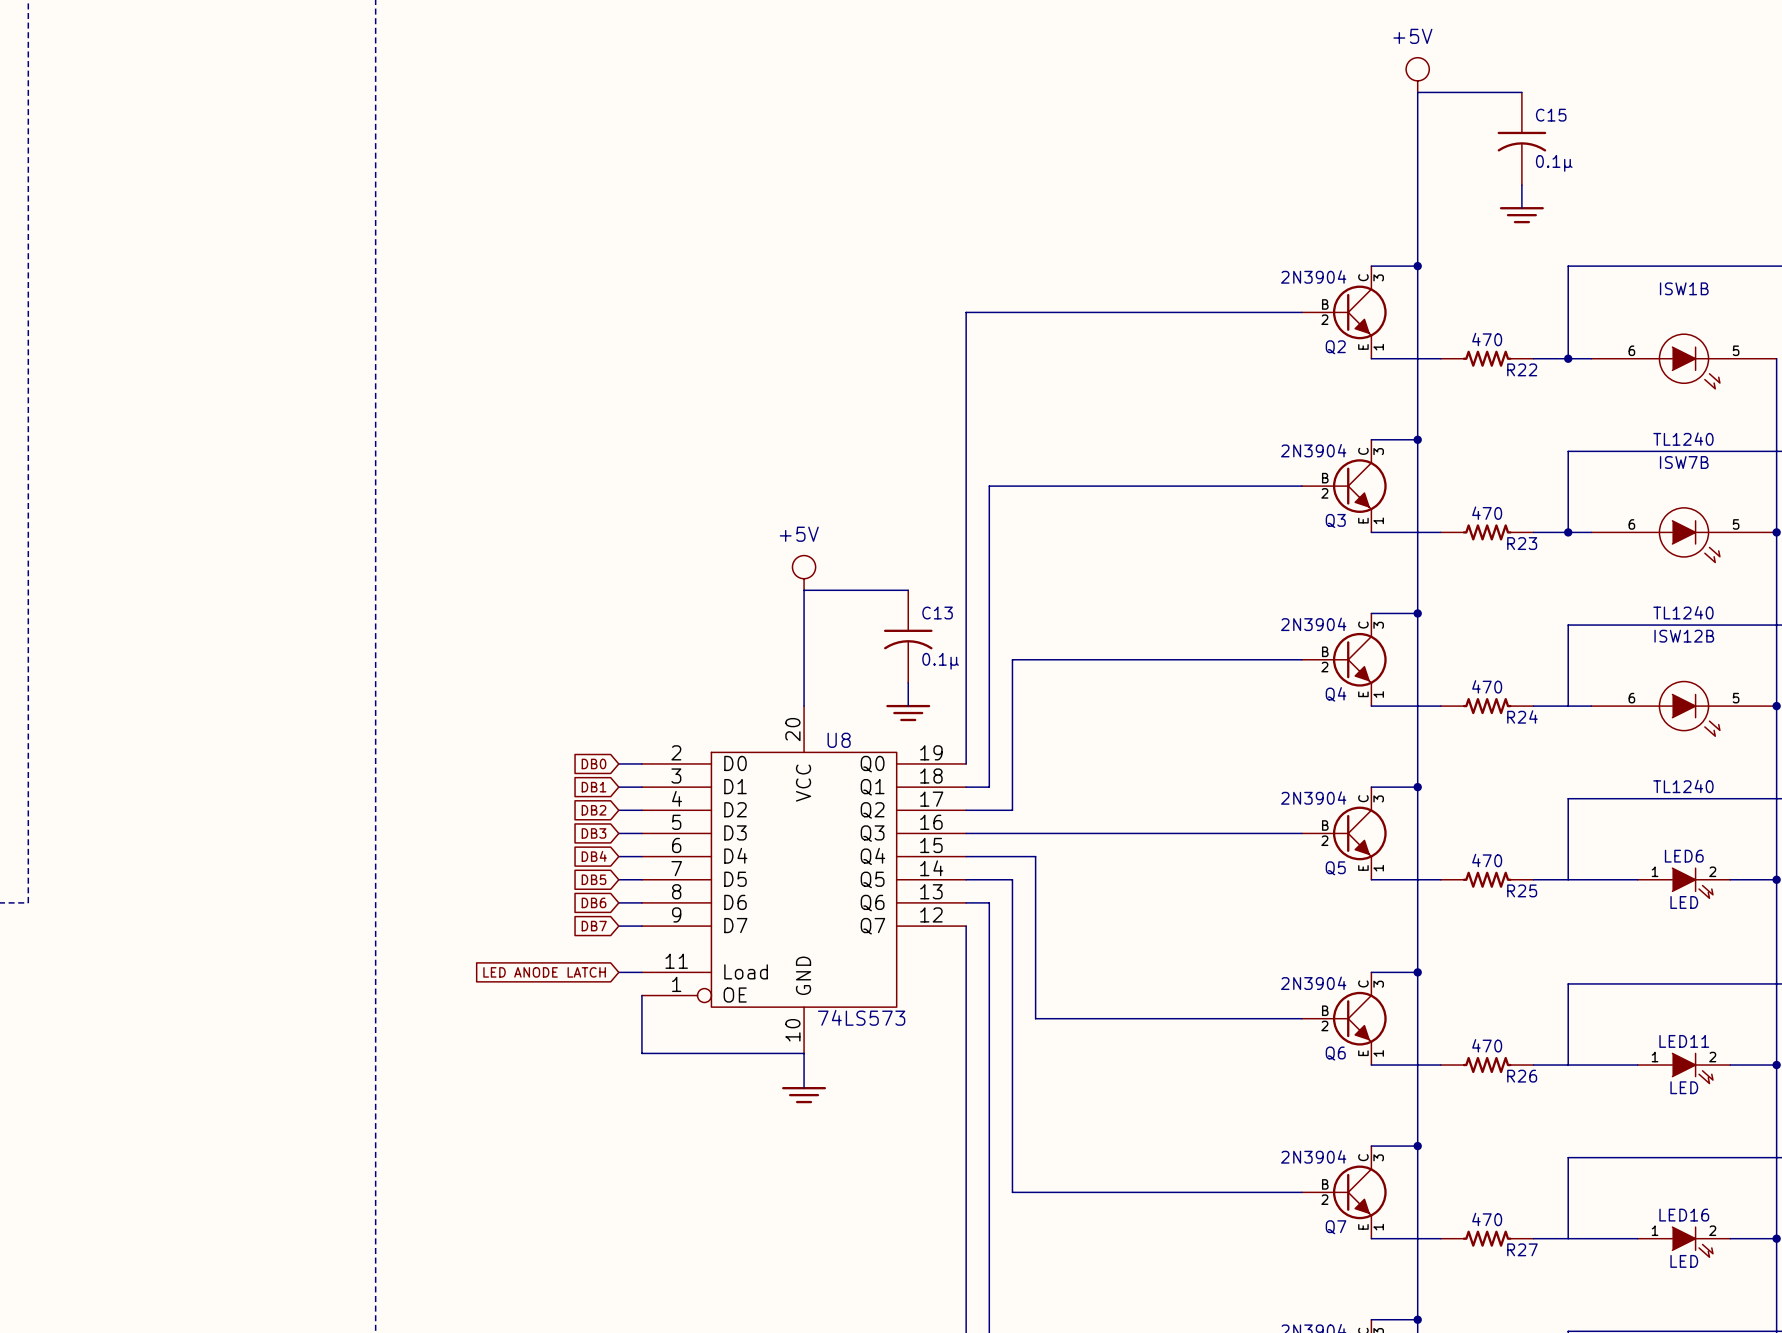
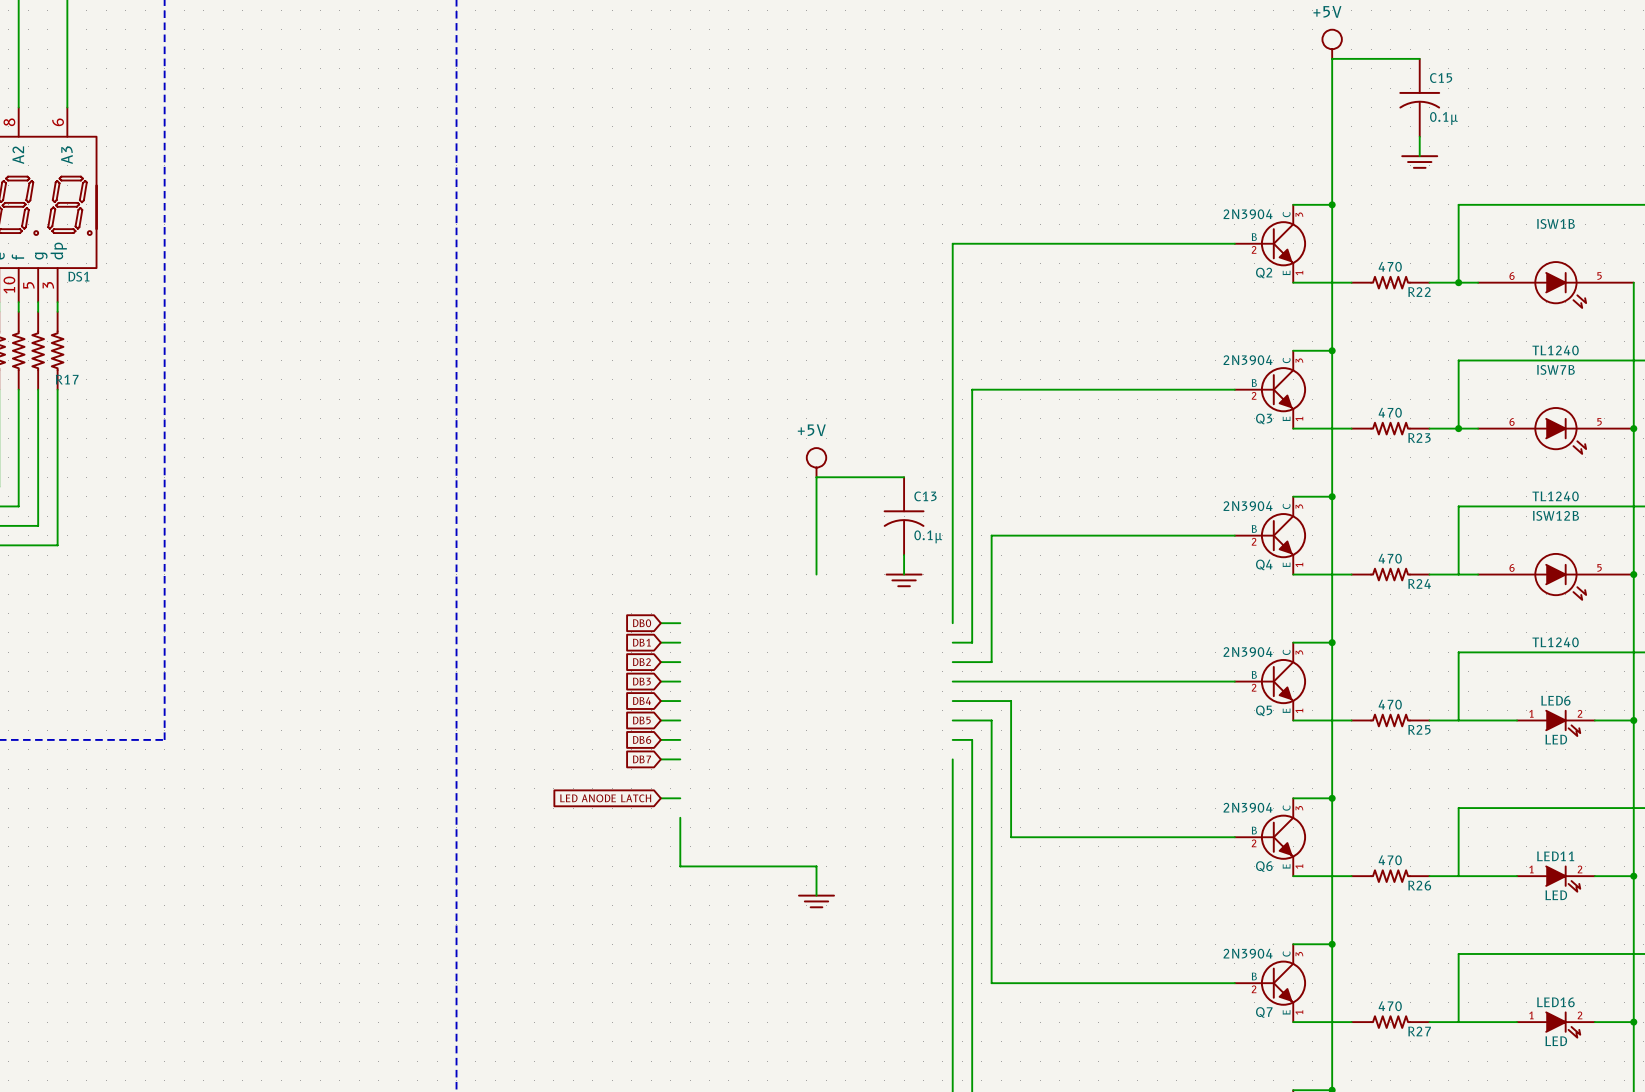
U8: 74LS573 (804, 879) -> none

